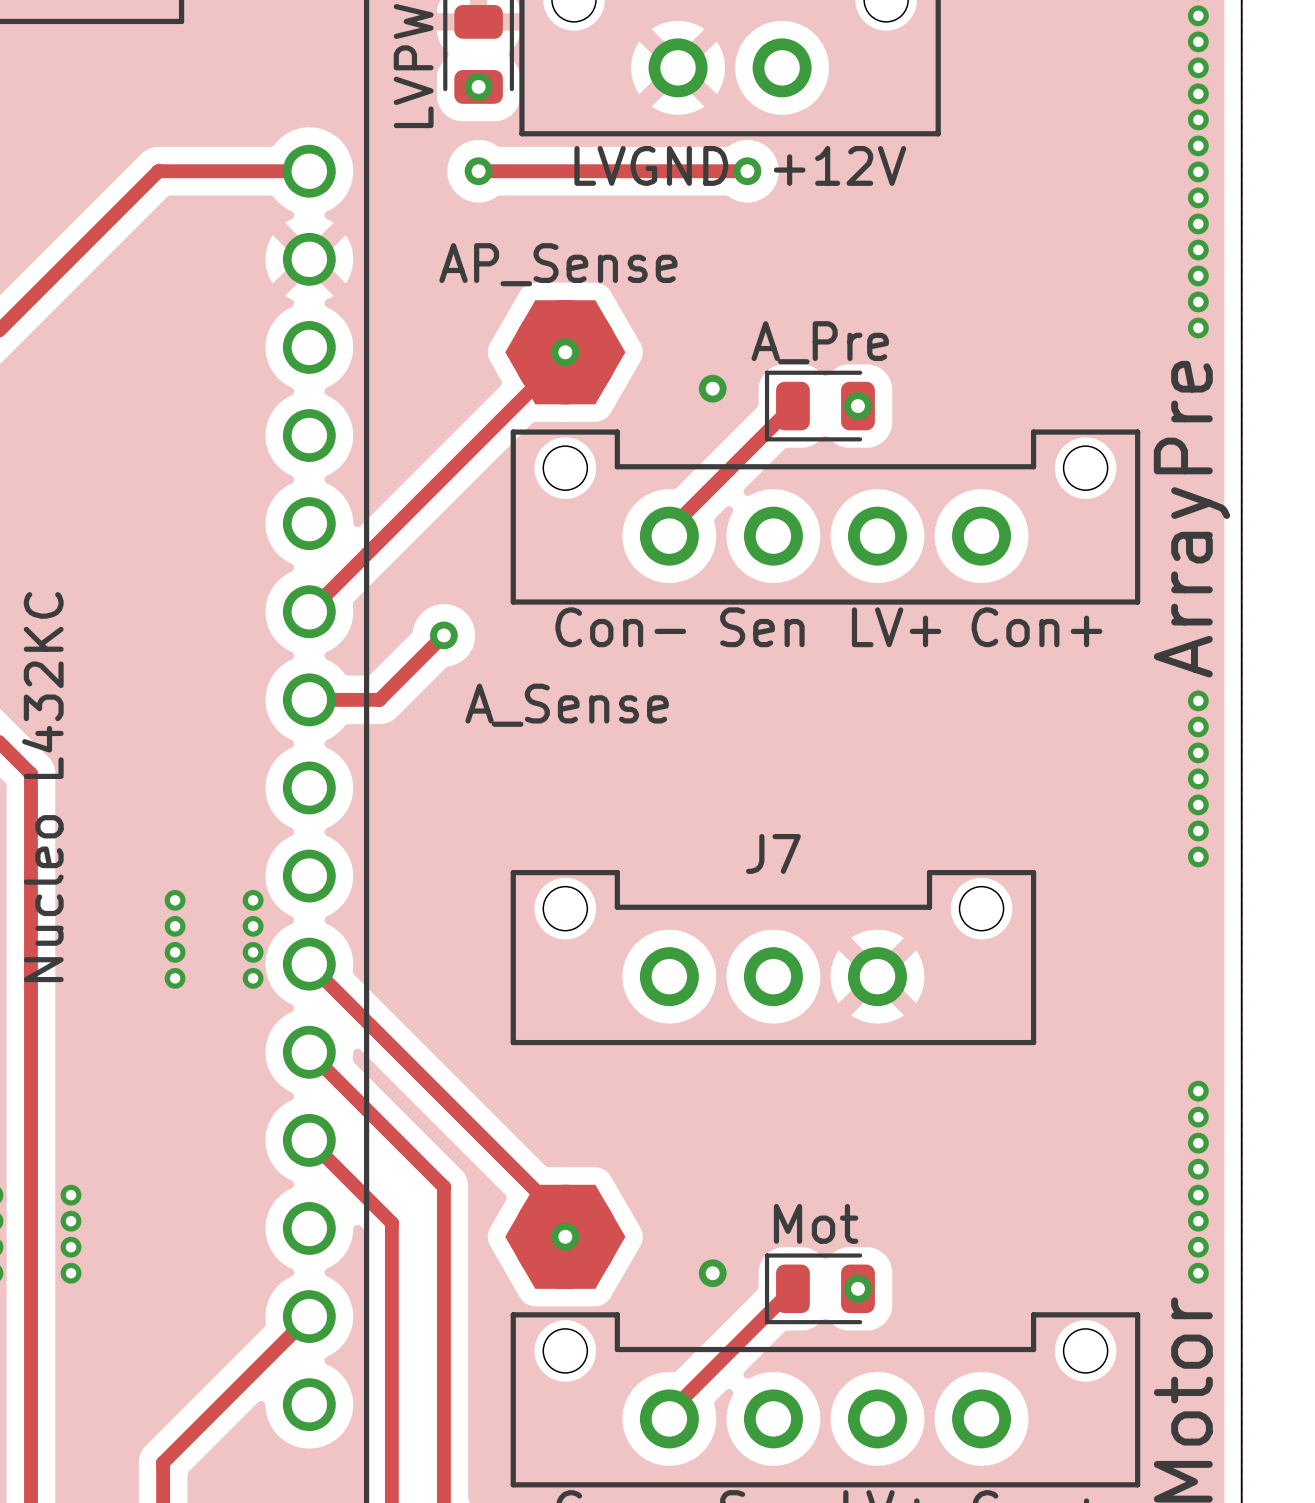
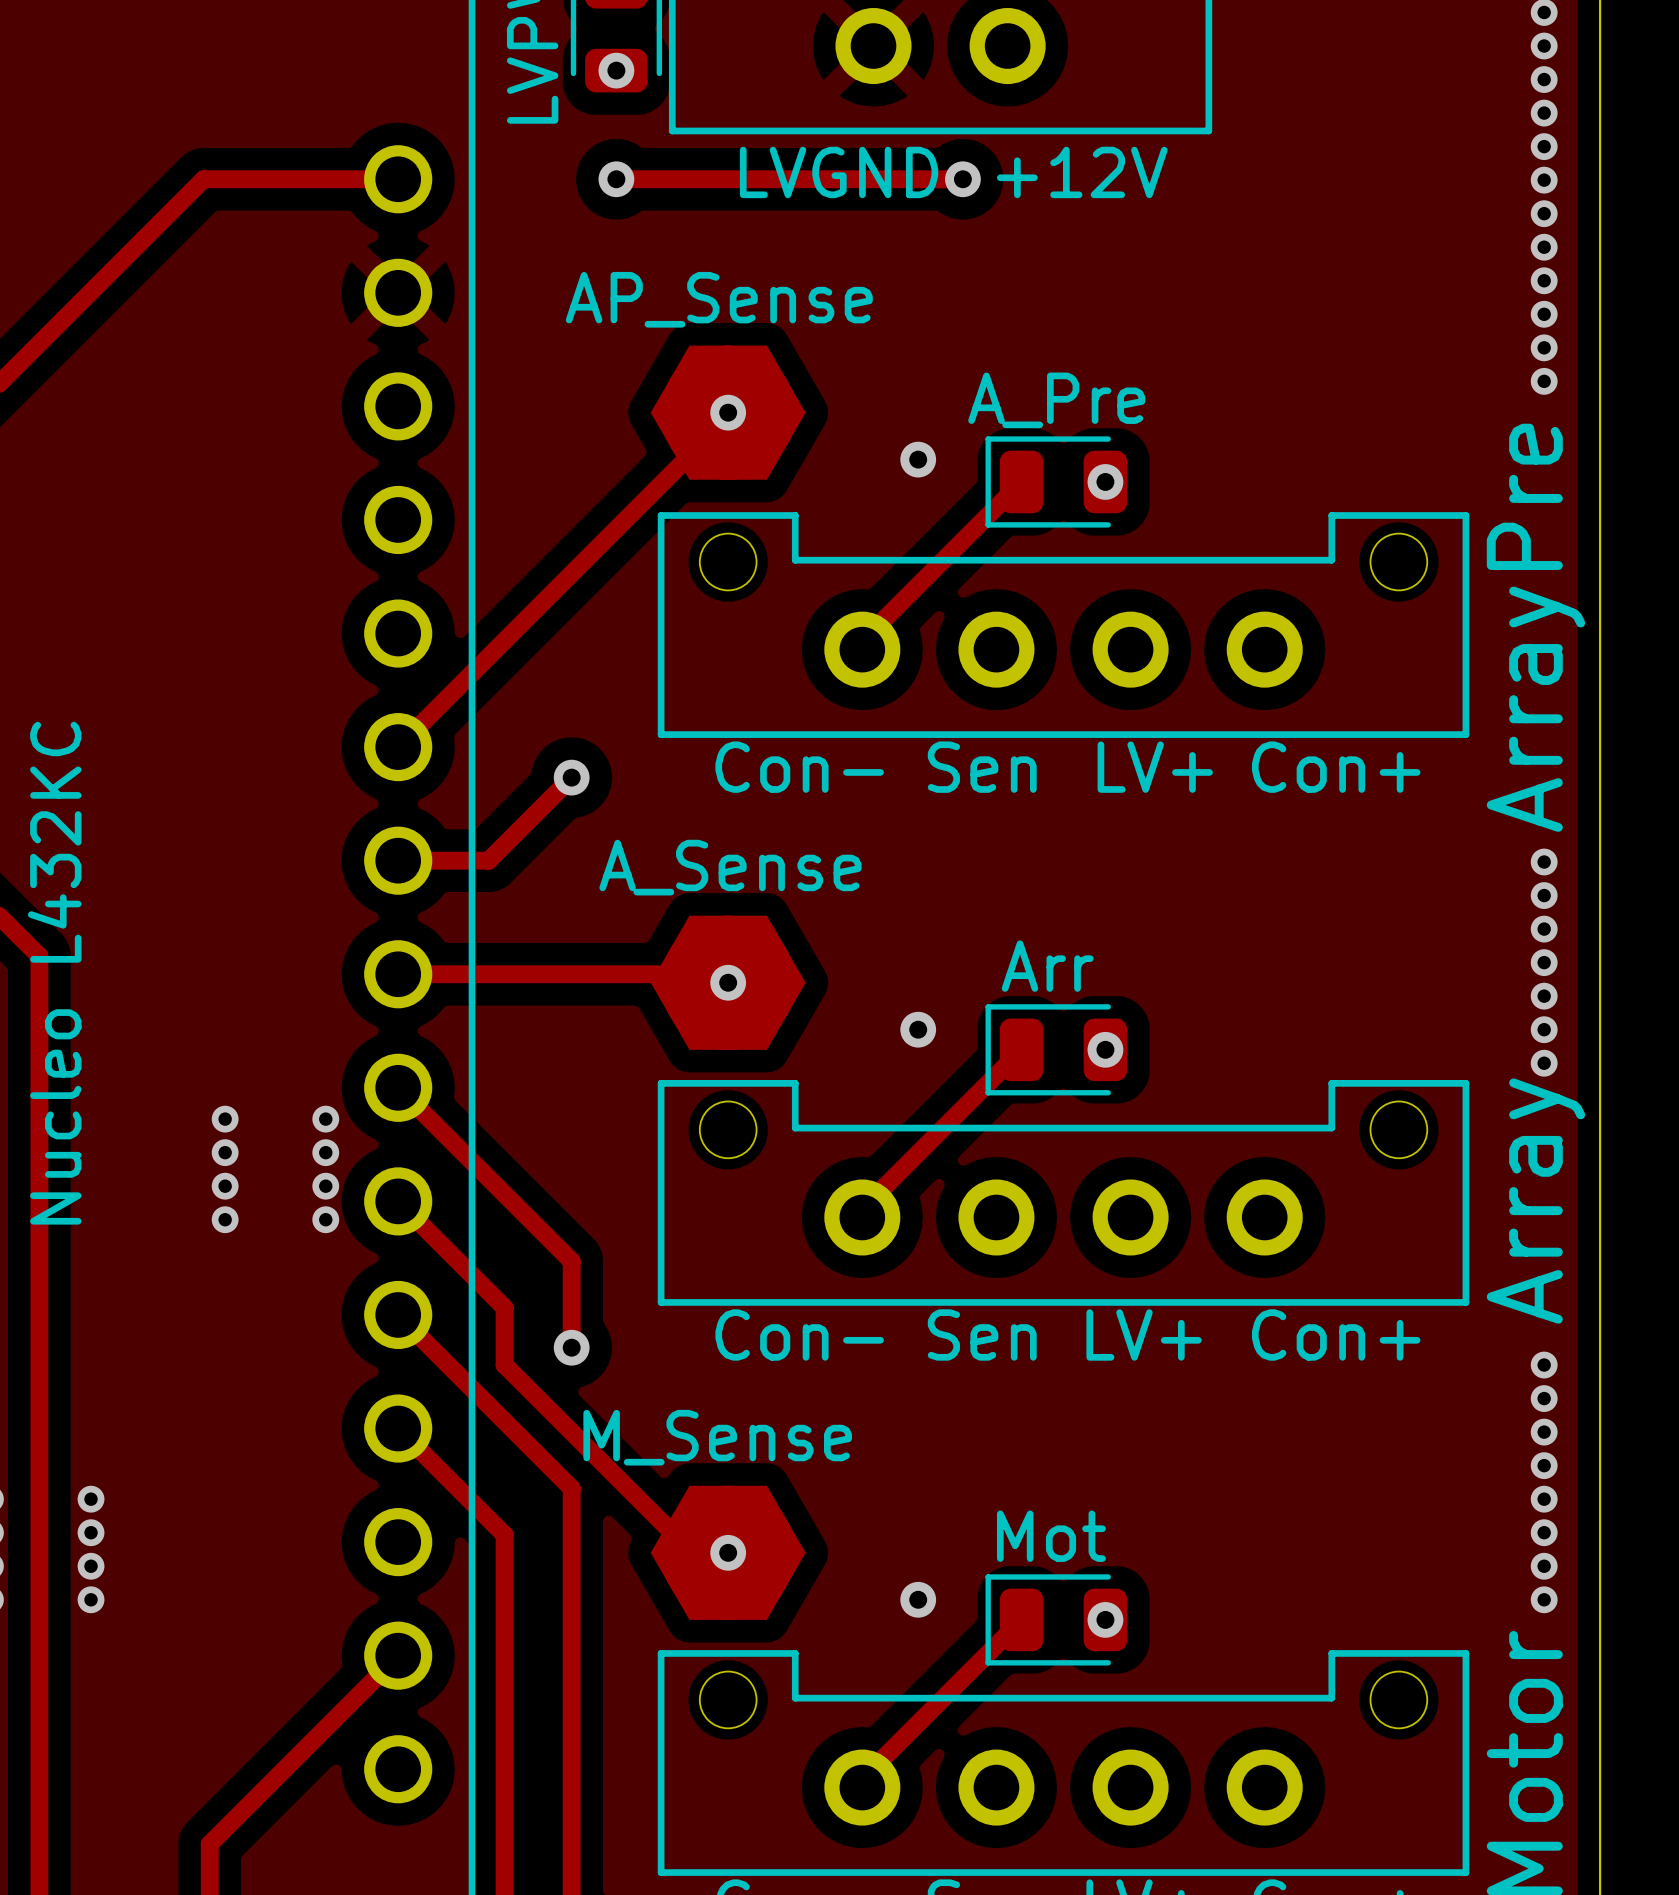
text: none -> Arr (1047, 966)
track: none -> (398, 974) (719, 974) (728, 982)
part: none -> (728, 982)
via: none -> (728, 982)
via: none -> (918, 1029)
track: none -> (1021, 1049) (862, 1209) (862, 1217)
part: none -> (1056, 1049)
via: none -> (1105, 1049)
track: none -> (398, 1087) (571, 1261) (571, 1347)
J7: (773, 957) -> none
part: none -> (1063, 1192)
text: none -> Array (1535, 1201)
track: (391, 1046) (565, 1220) (565, 1236) -> (504, 1307) (504, 1365) (692, 1552) (728, 1552)
text: none -> Con- (799, 1334)
text: none -> Sen (982, 1334)
text: none -> LV+ (1144, 1334)
text: none -> Con+ (1336, 1334)
via: none -> (571, 1347)
text: none -> M_Sense (717, 1437)

